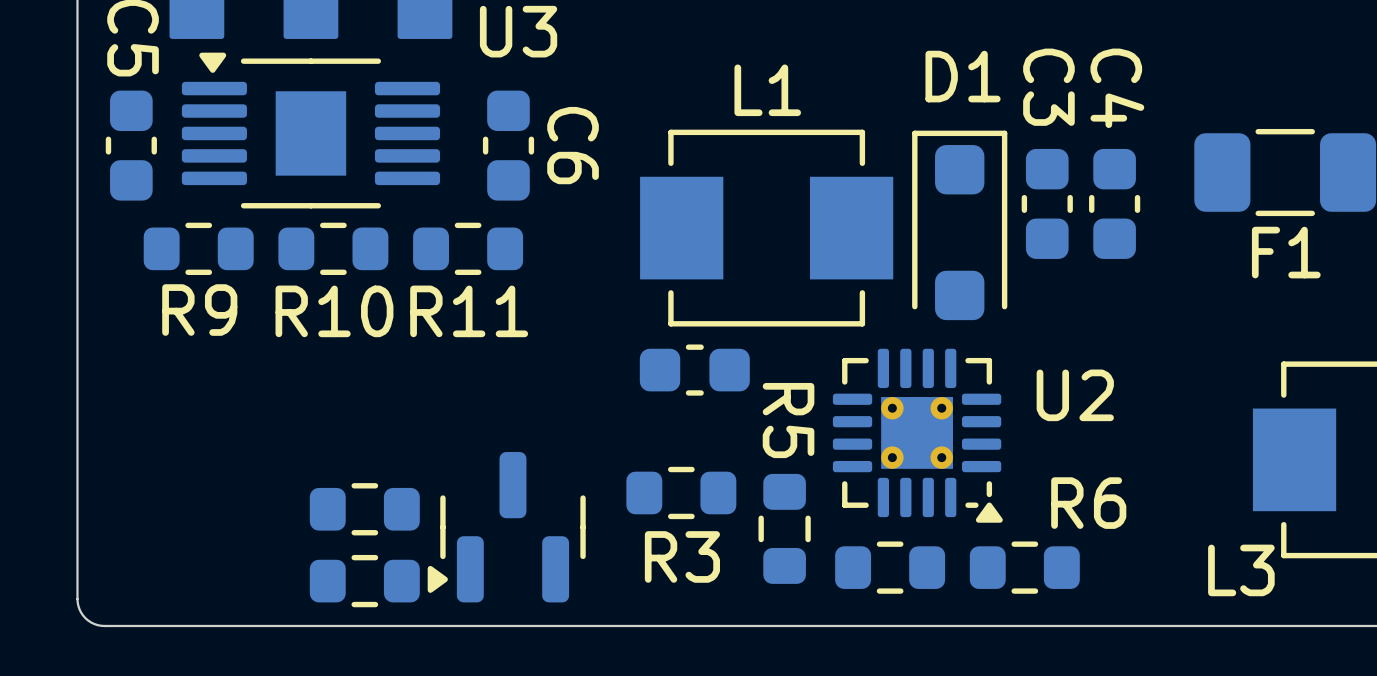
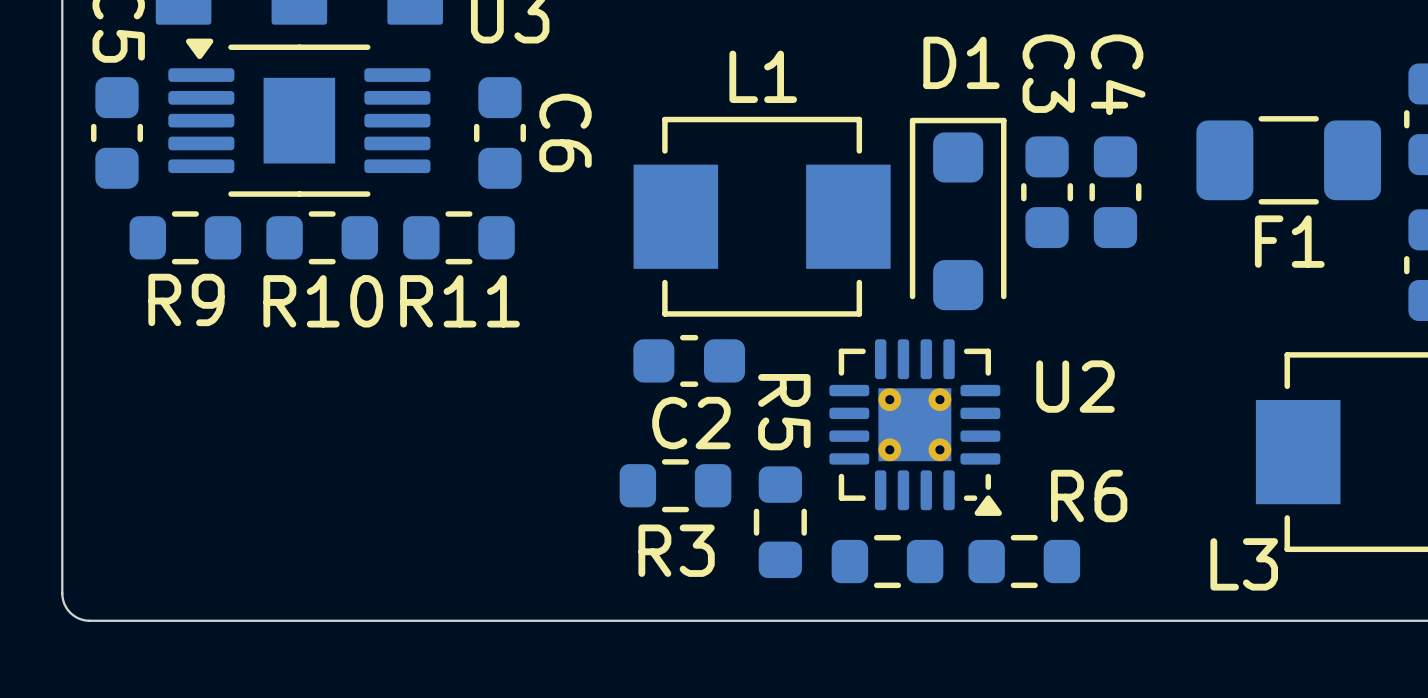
C2 name: none -> C2 (691, 423)
part: (364, 509) -> none
part: (506, 527) -> none
part: (364, 581) -> none

